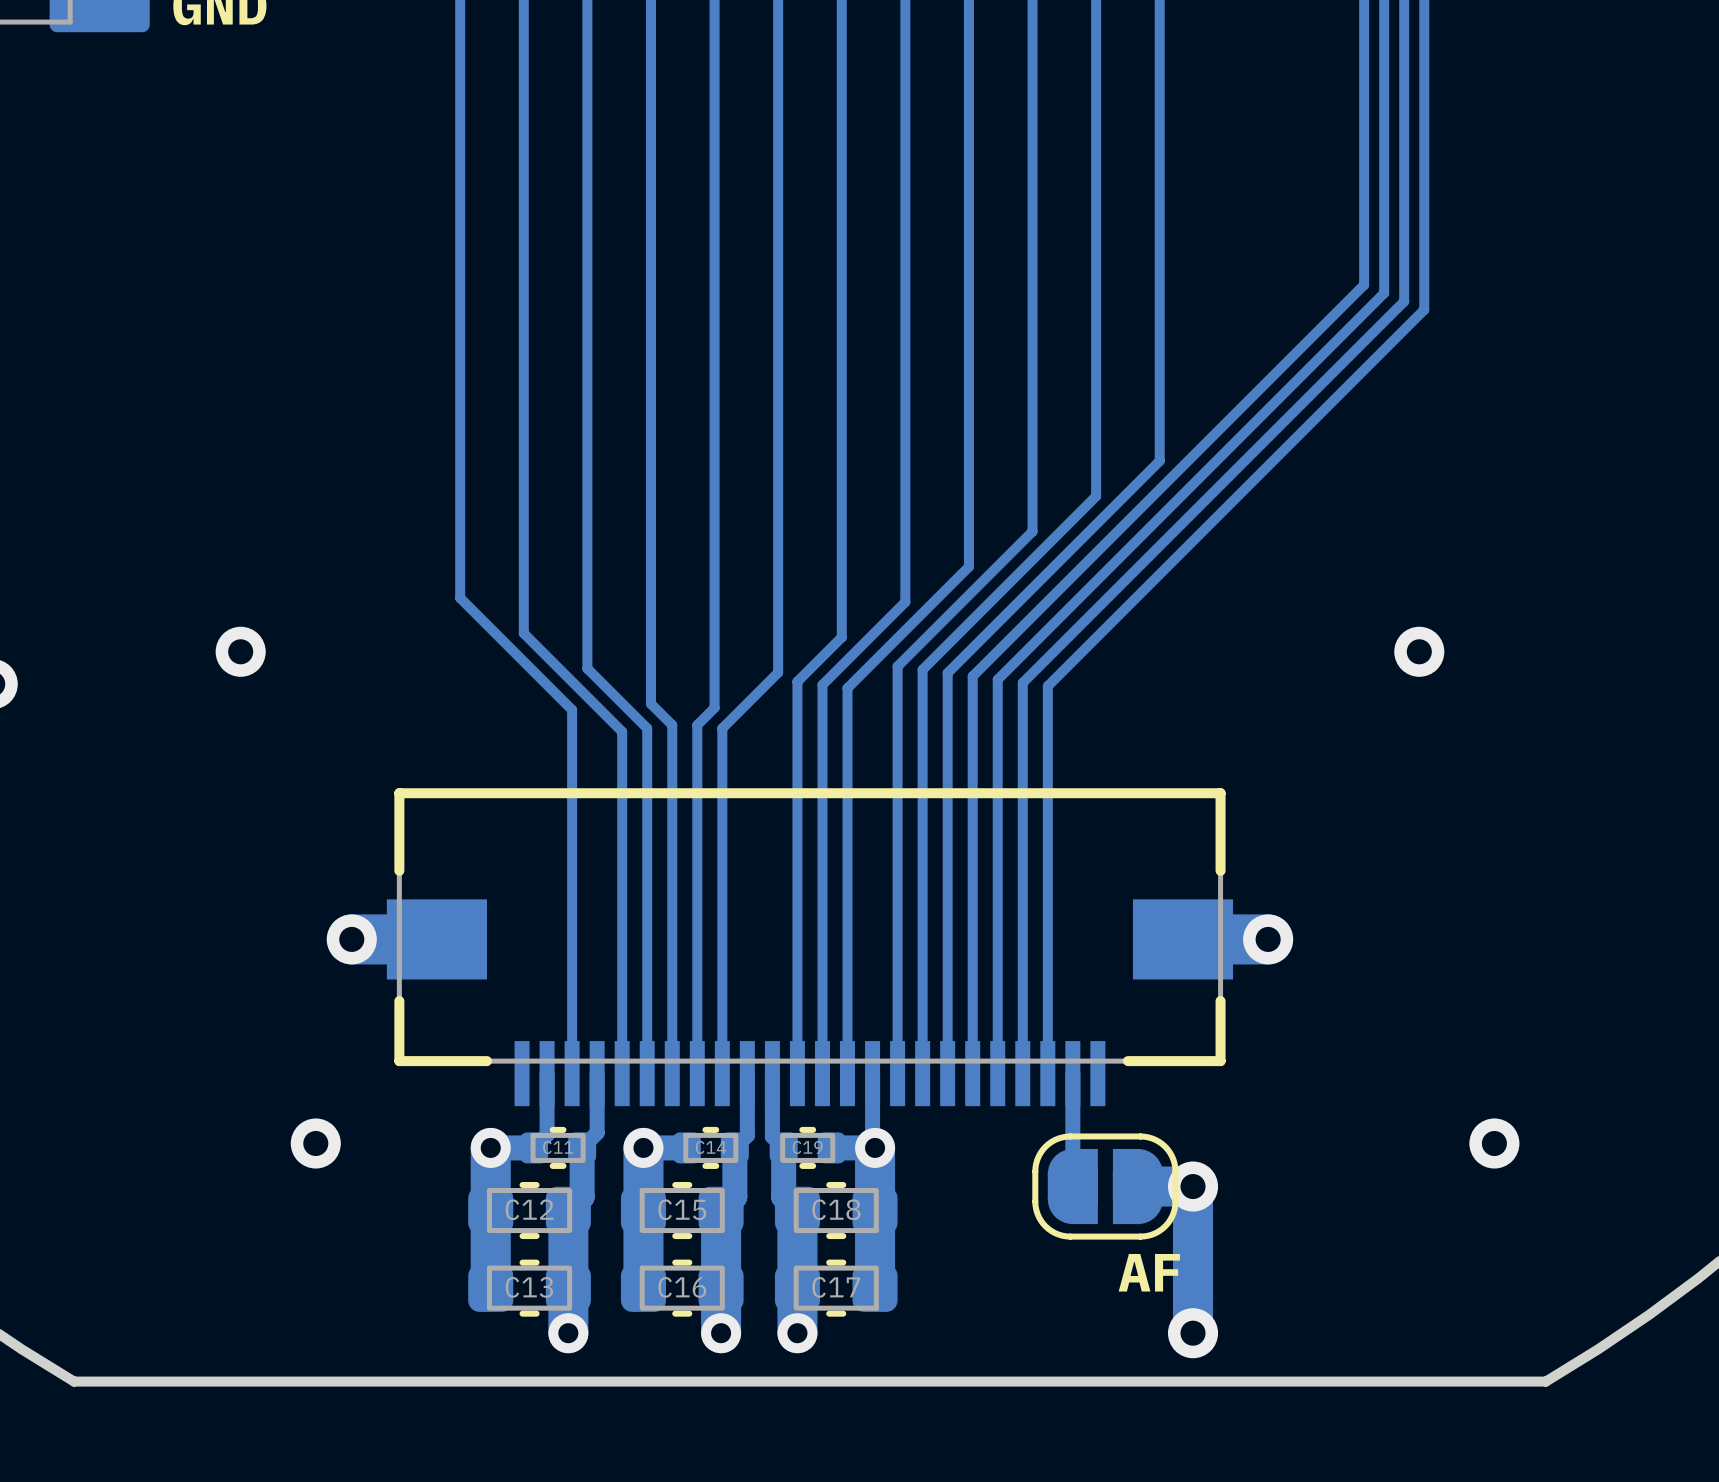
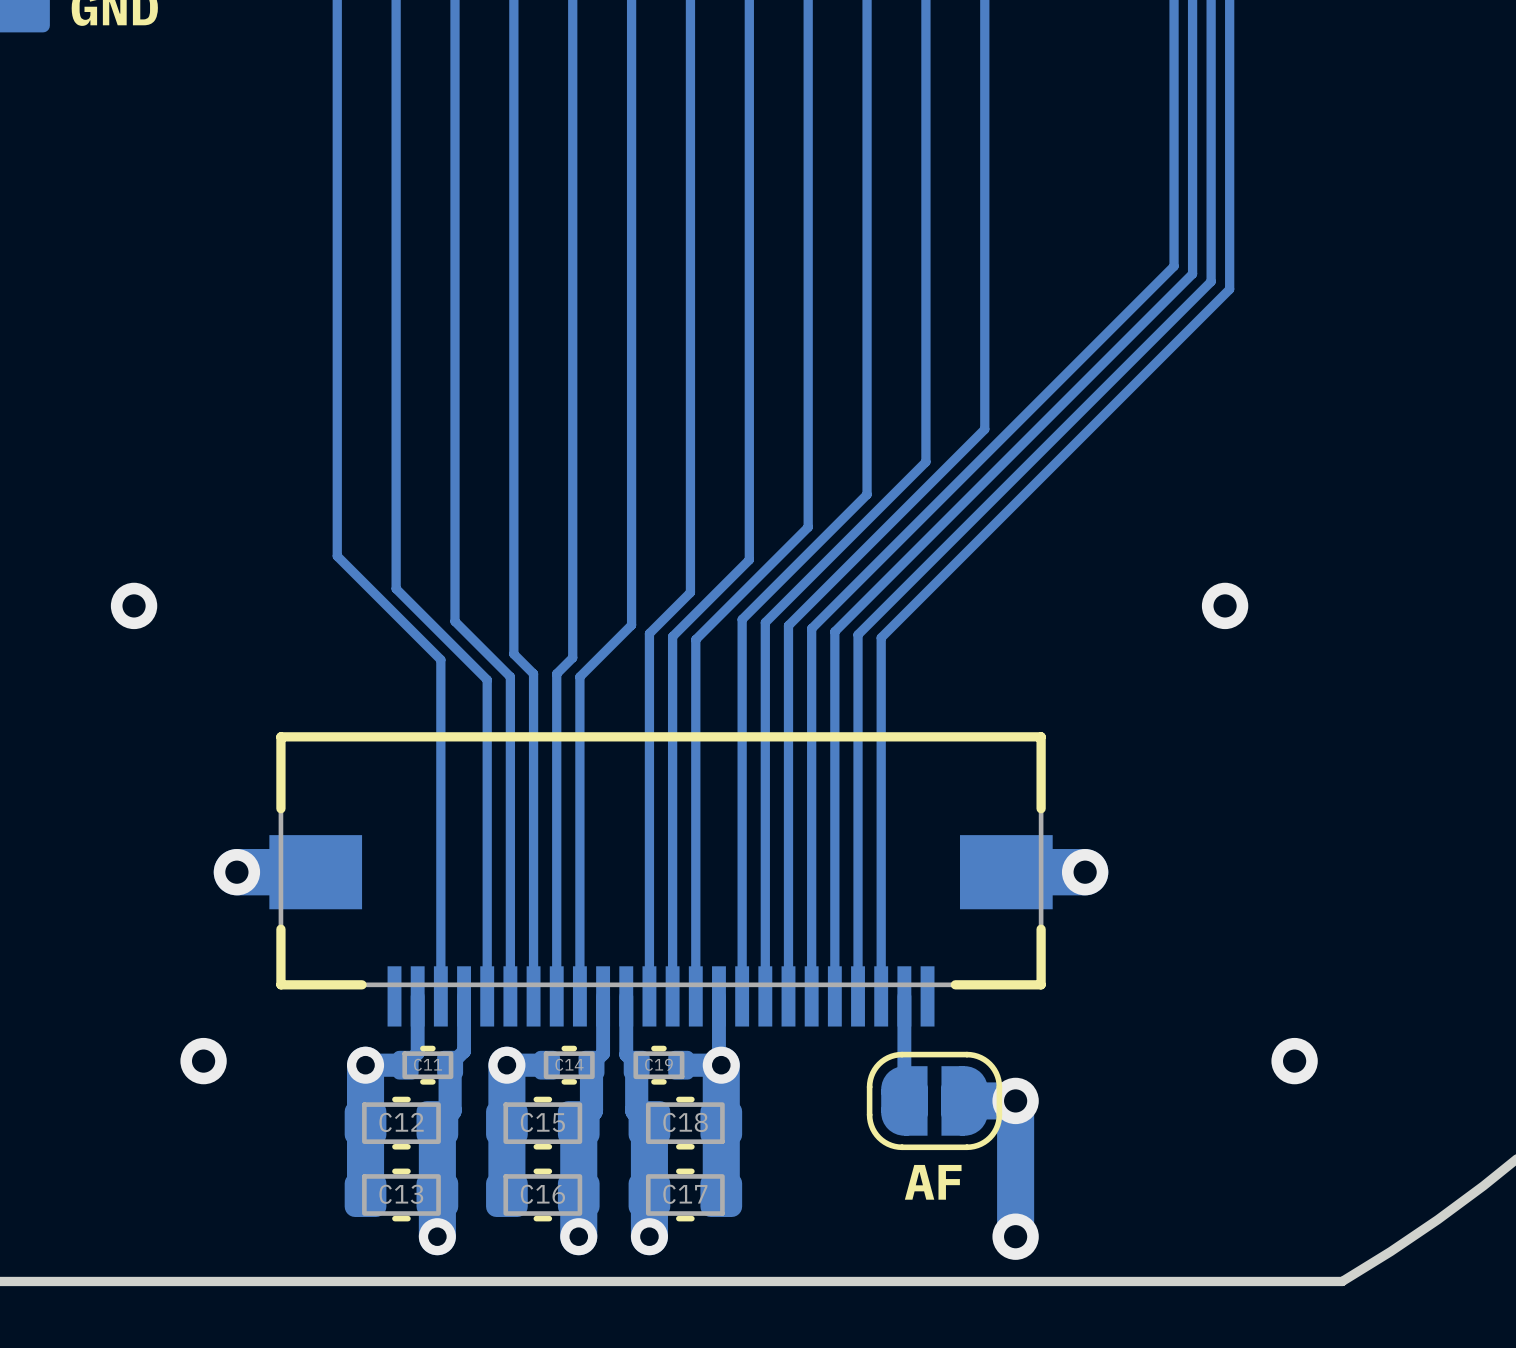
text position: AF (1149, 1272) -> AF (933, 1182)

